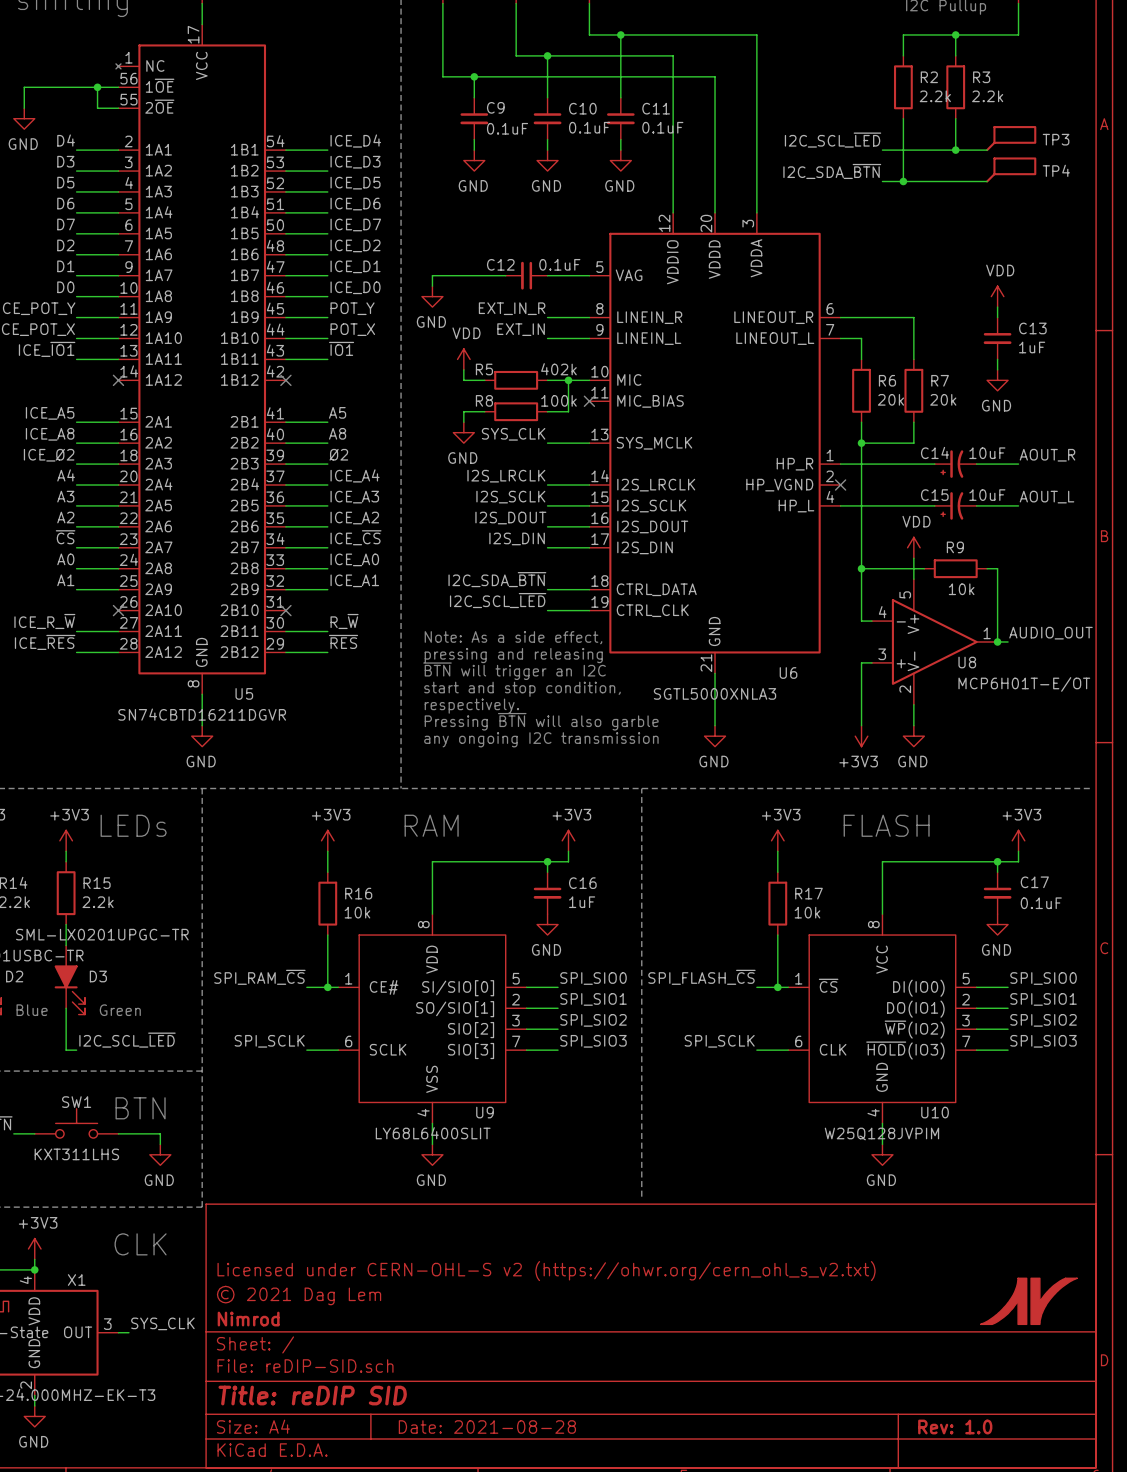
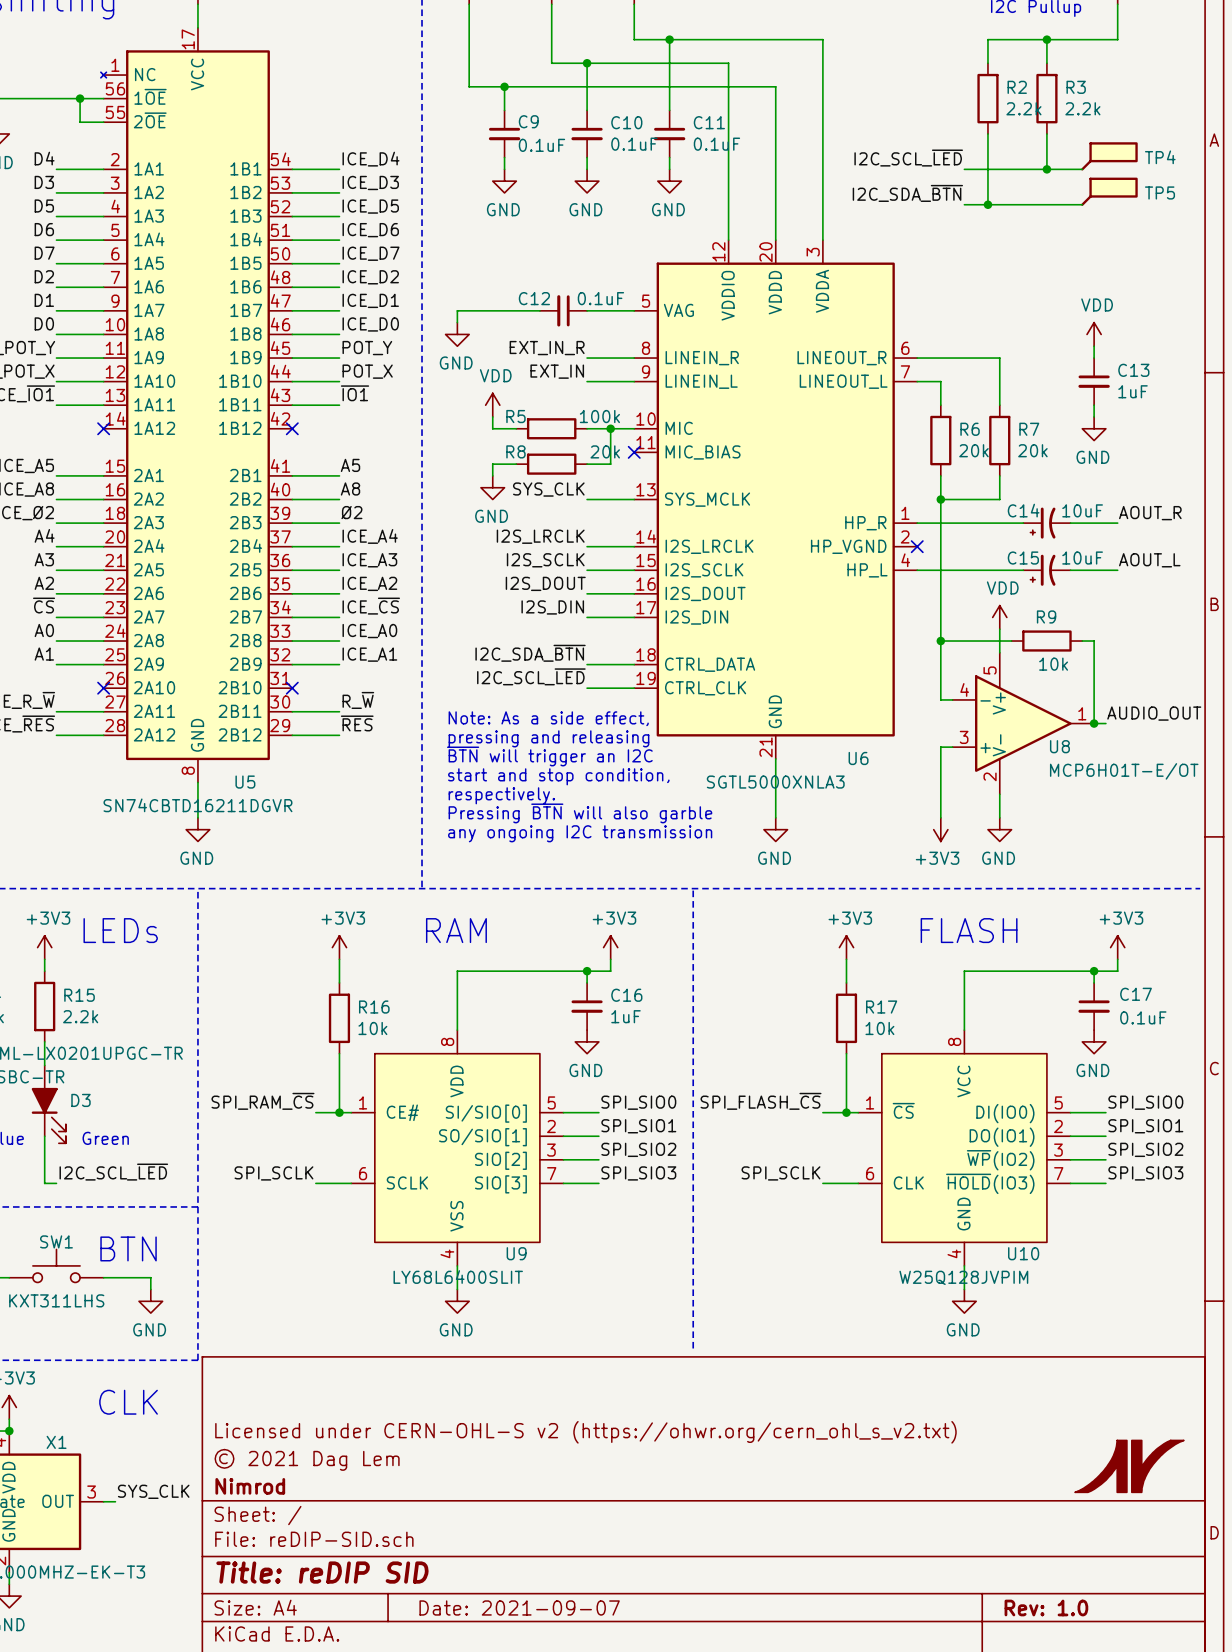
TP3 name: TP3 (1056, 139) -> TP4 (1160, 157)
TP4 name: TP4 (1056, 170) -> TP5 (1159, 192)
R5 value: 402k (558, 369) -> 100k (599, 416)
R8 value: 100k (558, 400) -> 20k (605, 451)
title block: Date: 2021-08-28 (487, 1427) -> Date: 2021-09-07 (519, 1607)

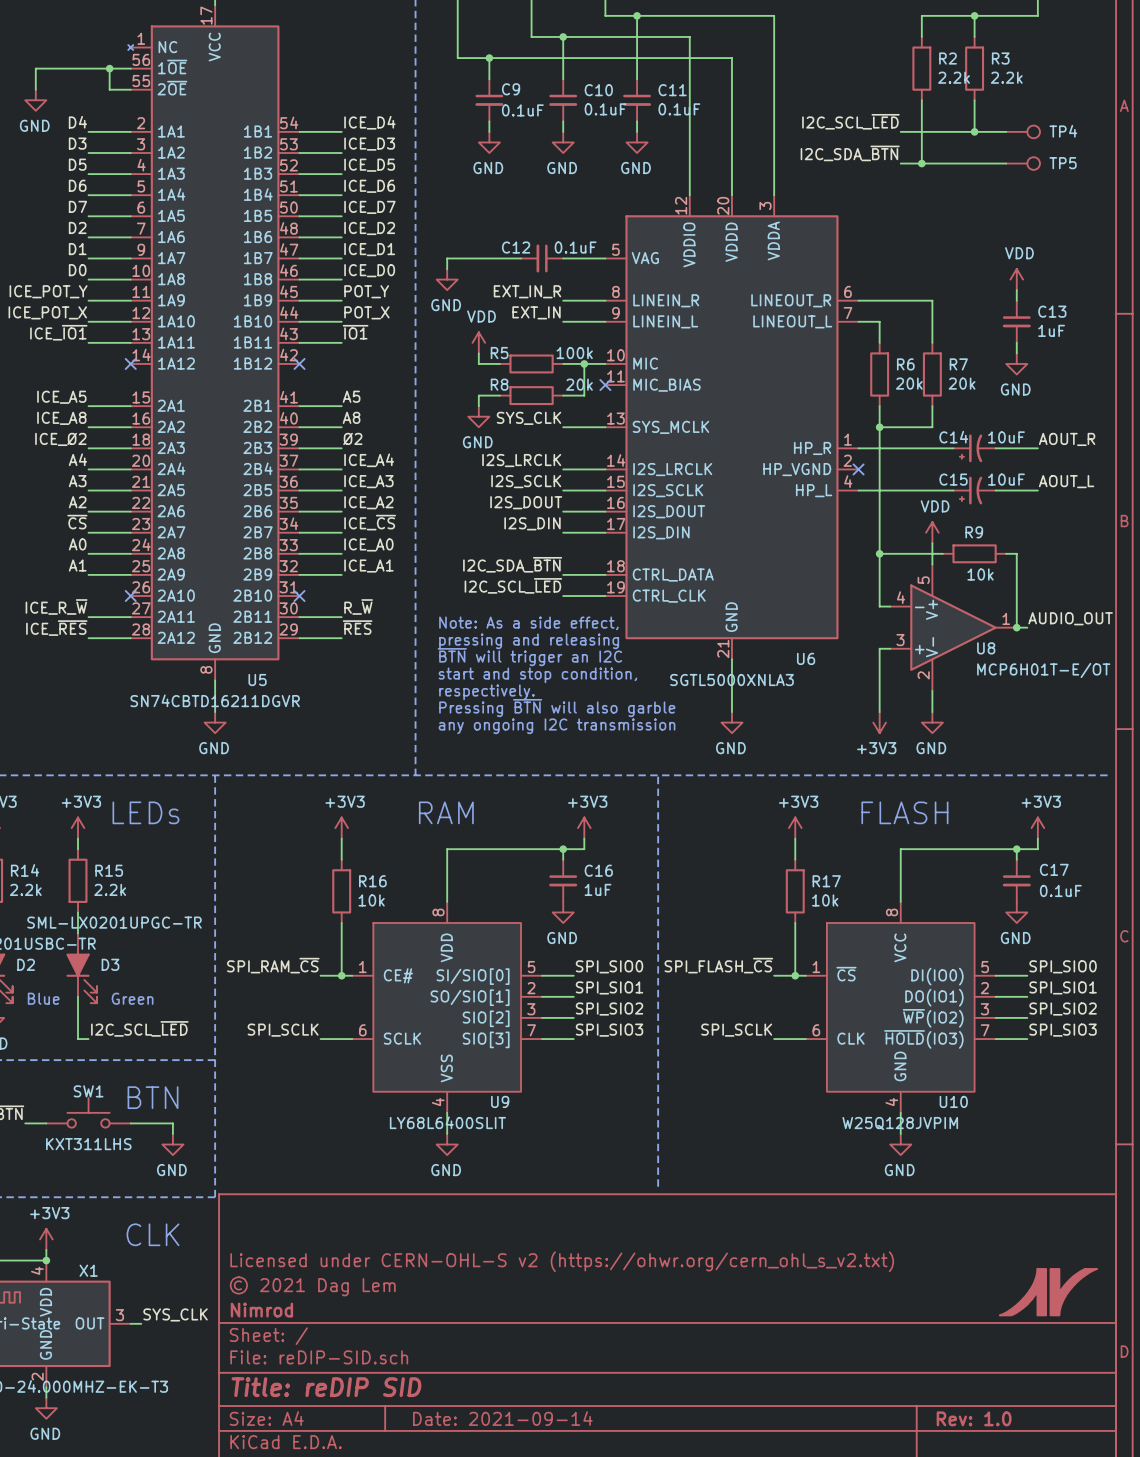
TP4 symbol: [1081, 142, 1138, 171] -> [1006, 125, 1040, 139]
TP5 symbol: [1081, 177, 1138, 206] -> [1006, 157, 1040, 170]
title block: Date: 2021-09-07 (519, 1607) -> Date: 2021-09-14 (502, 1418)

